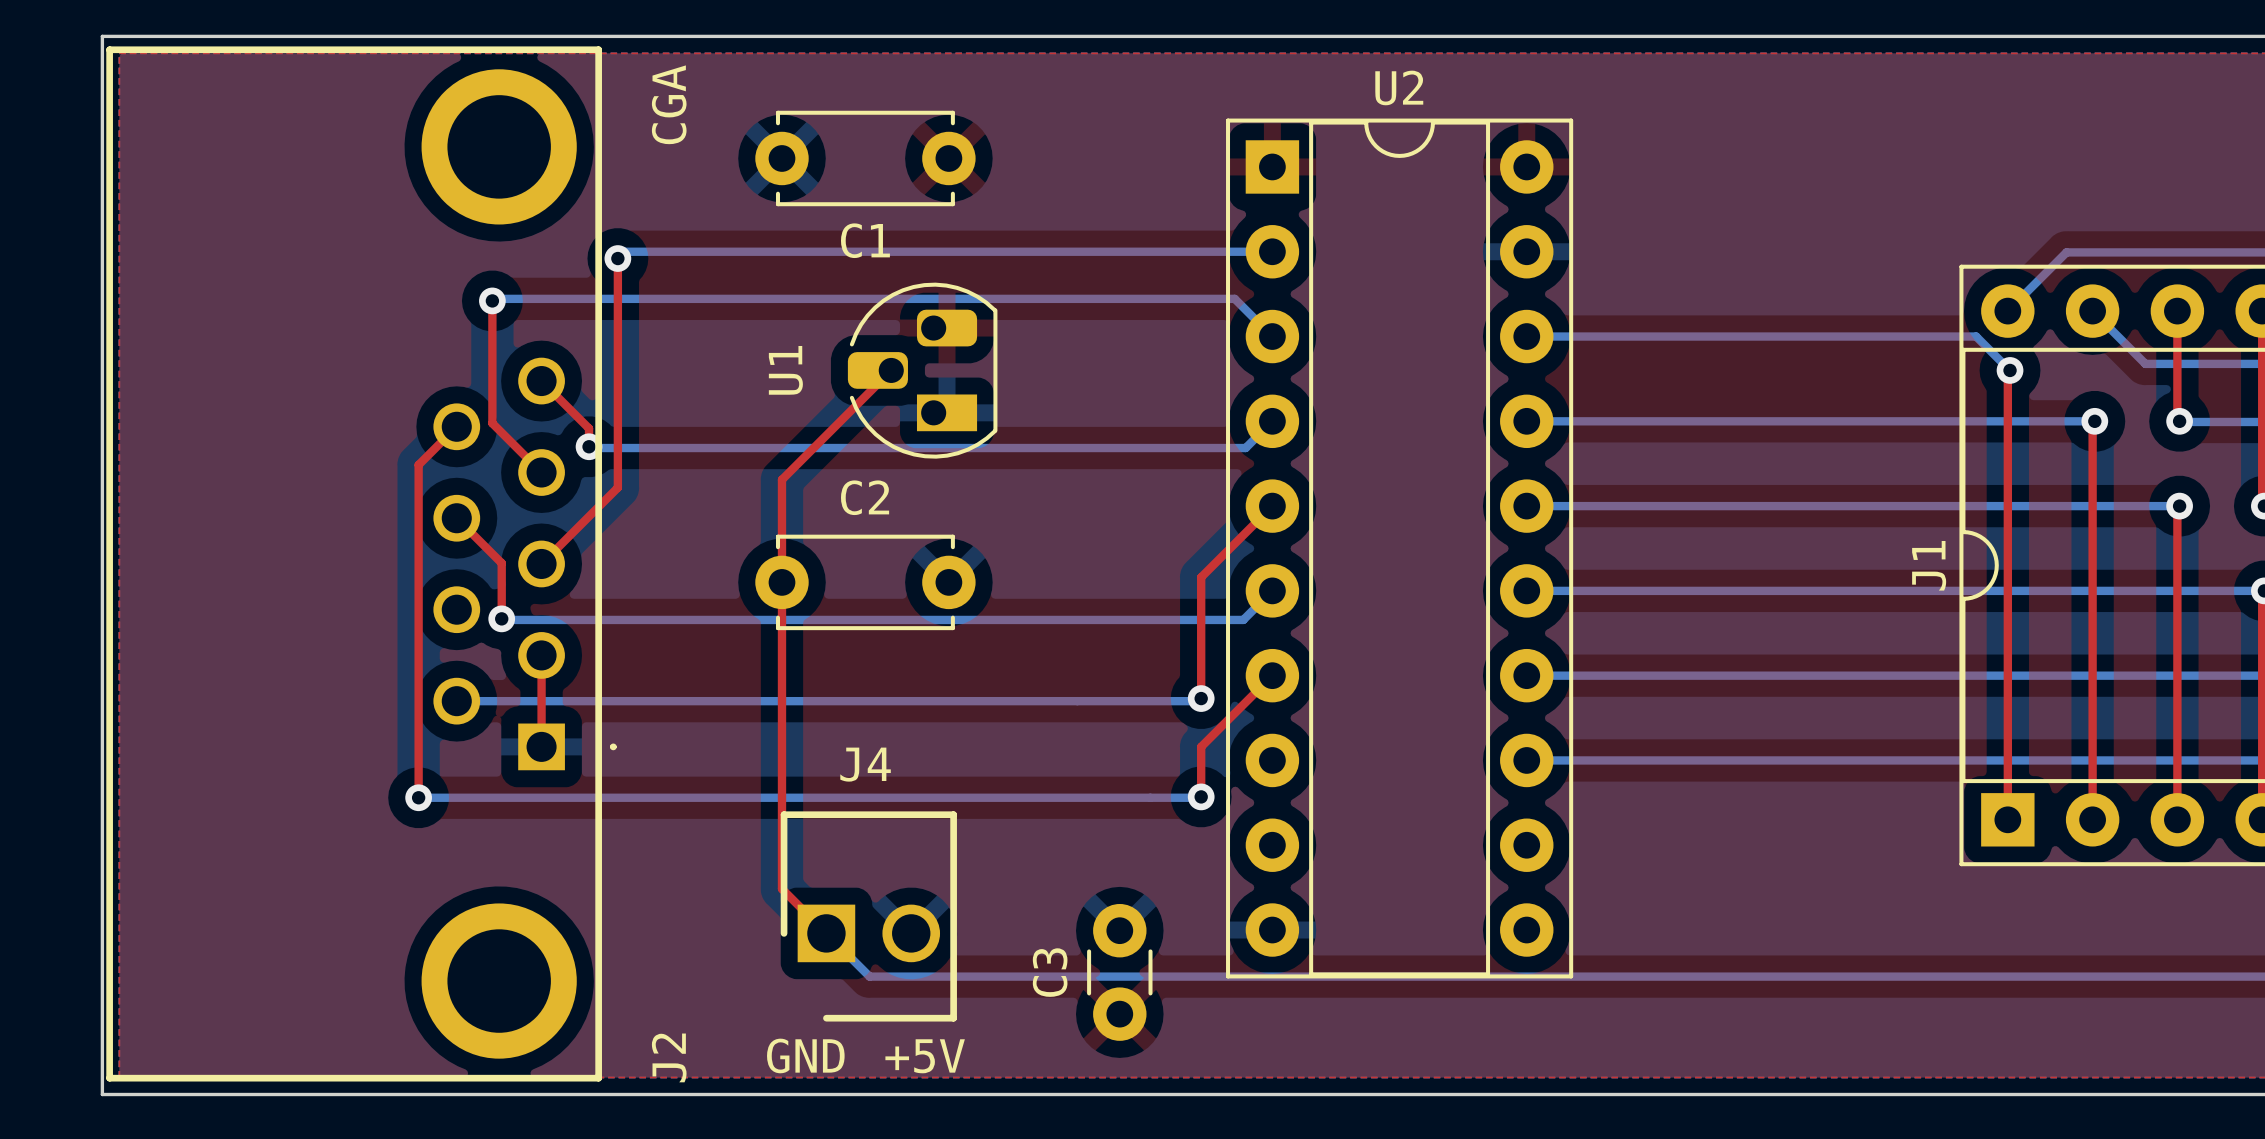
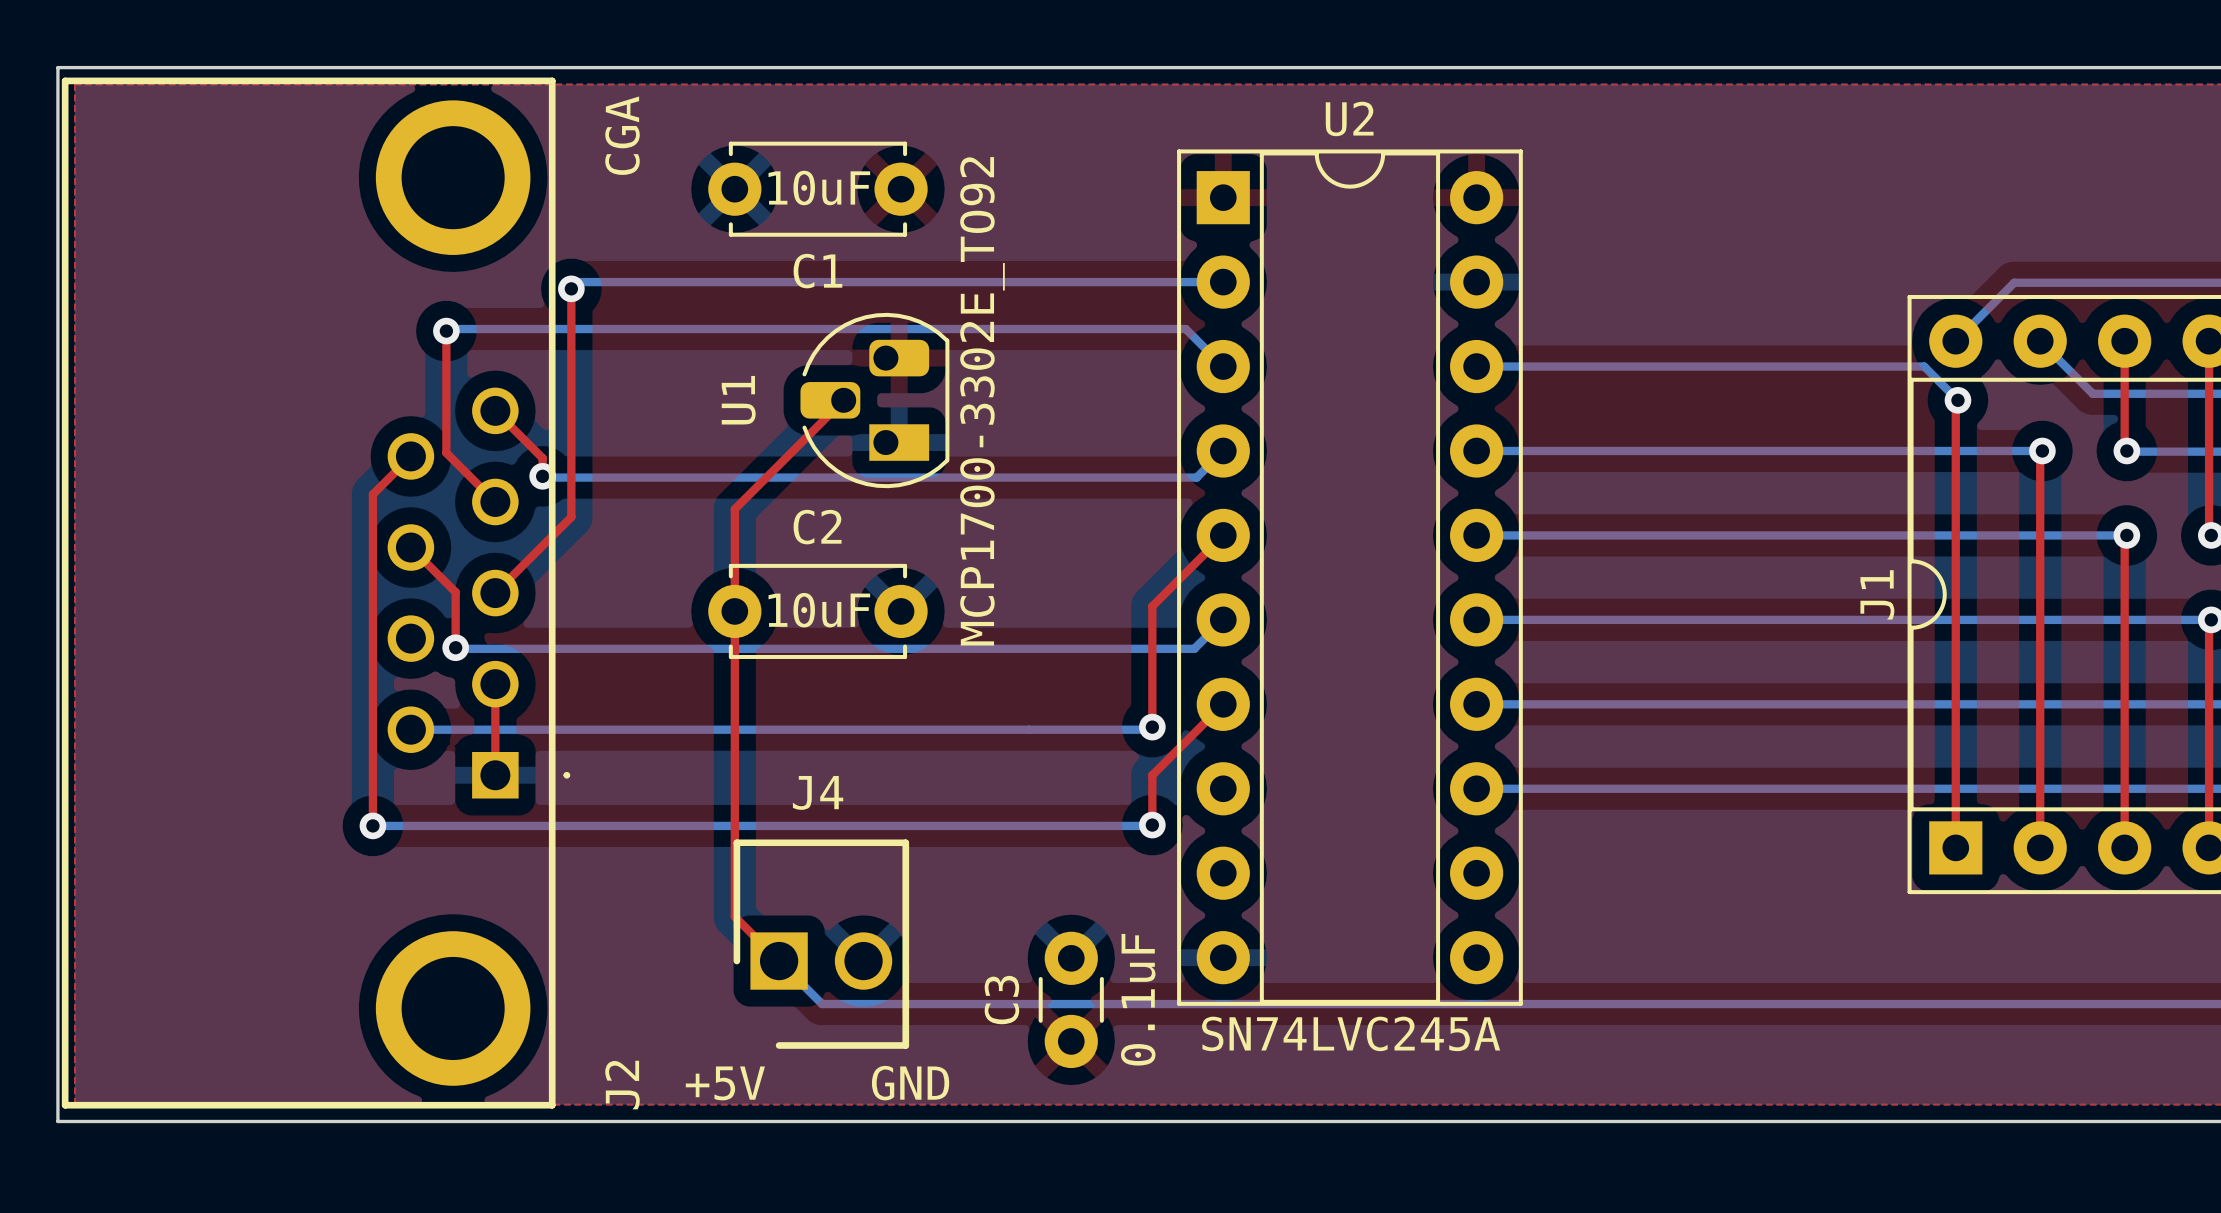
C1 value: none -> 10uF (819, 187)
U1 value: none -> MCP1700-3302E_TO92 (982, 401)
C2 value: none -> 10uF (819, 610)
C3 value: none -> 0.1uF (1138, 999)
U2 value: none -> SN74LVC245A (1351, 1033)
text position: GND (805, 1055) -> GND (910, 1083)
text position: +5V (925, 1056) -> +5V (725, 1083)

